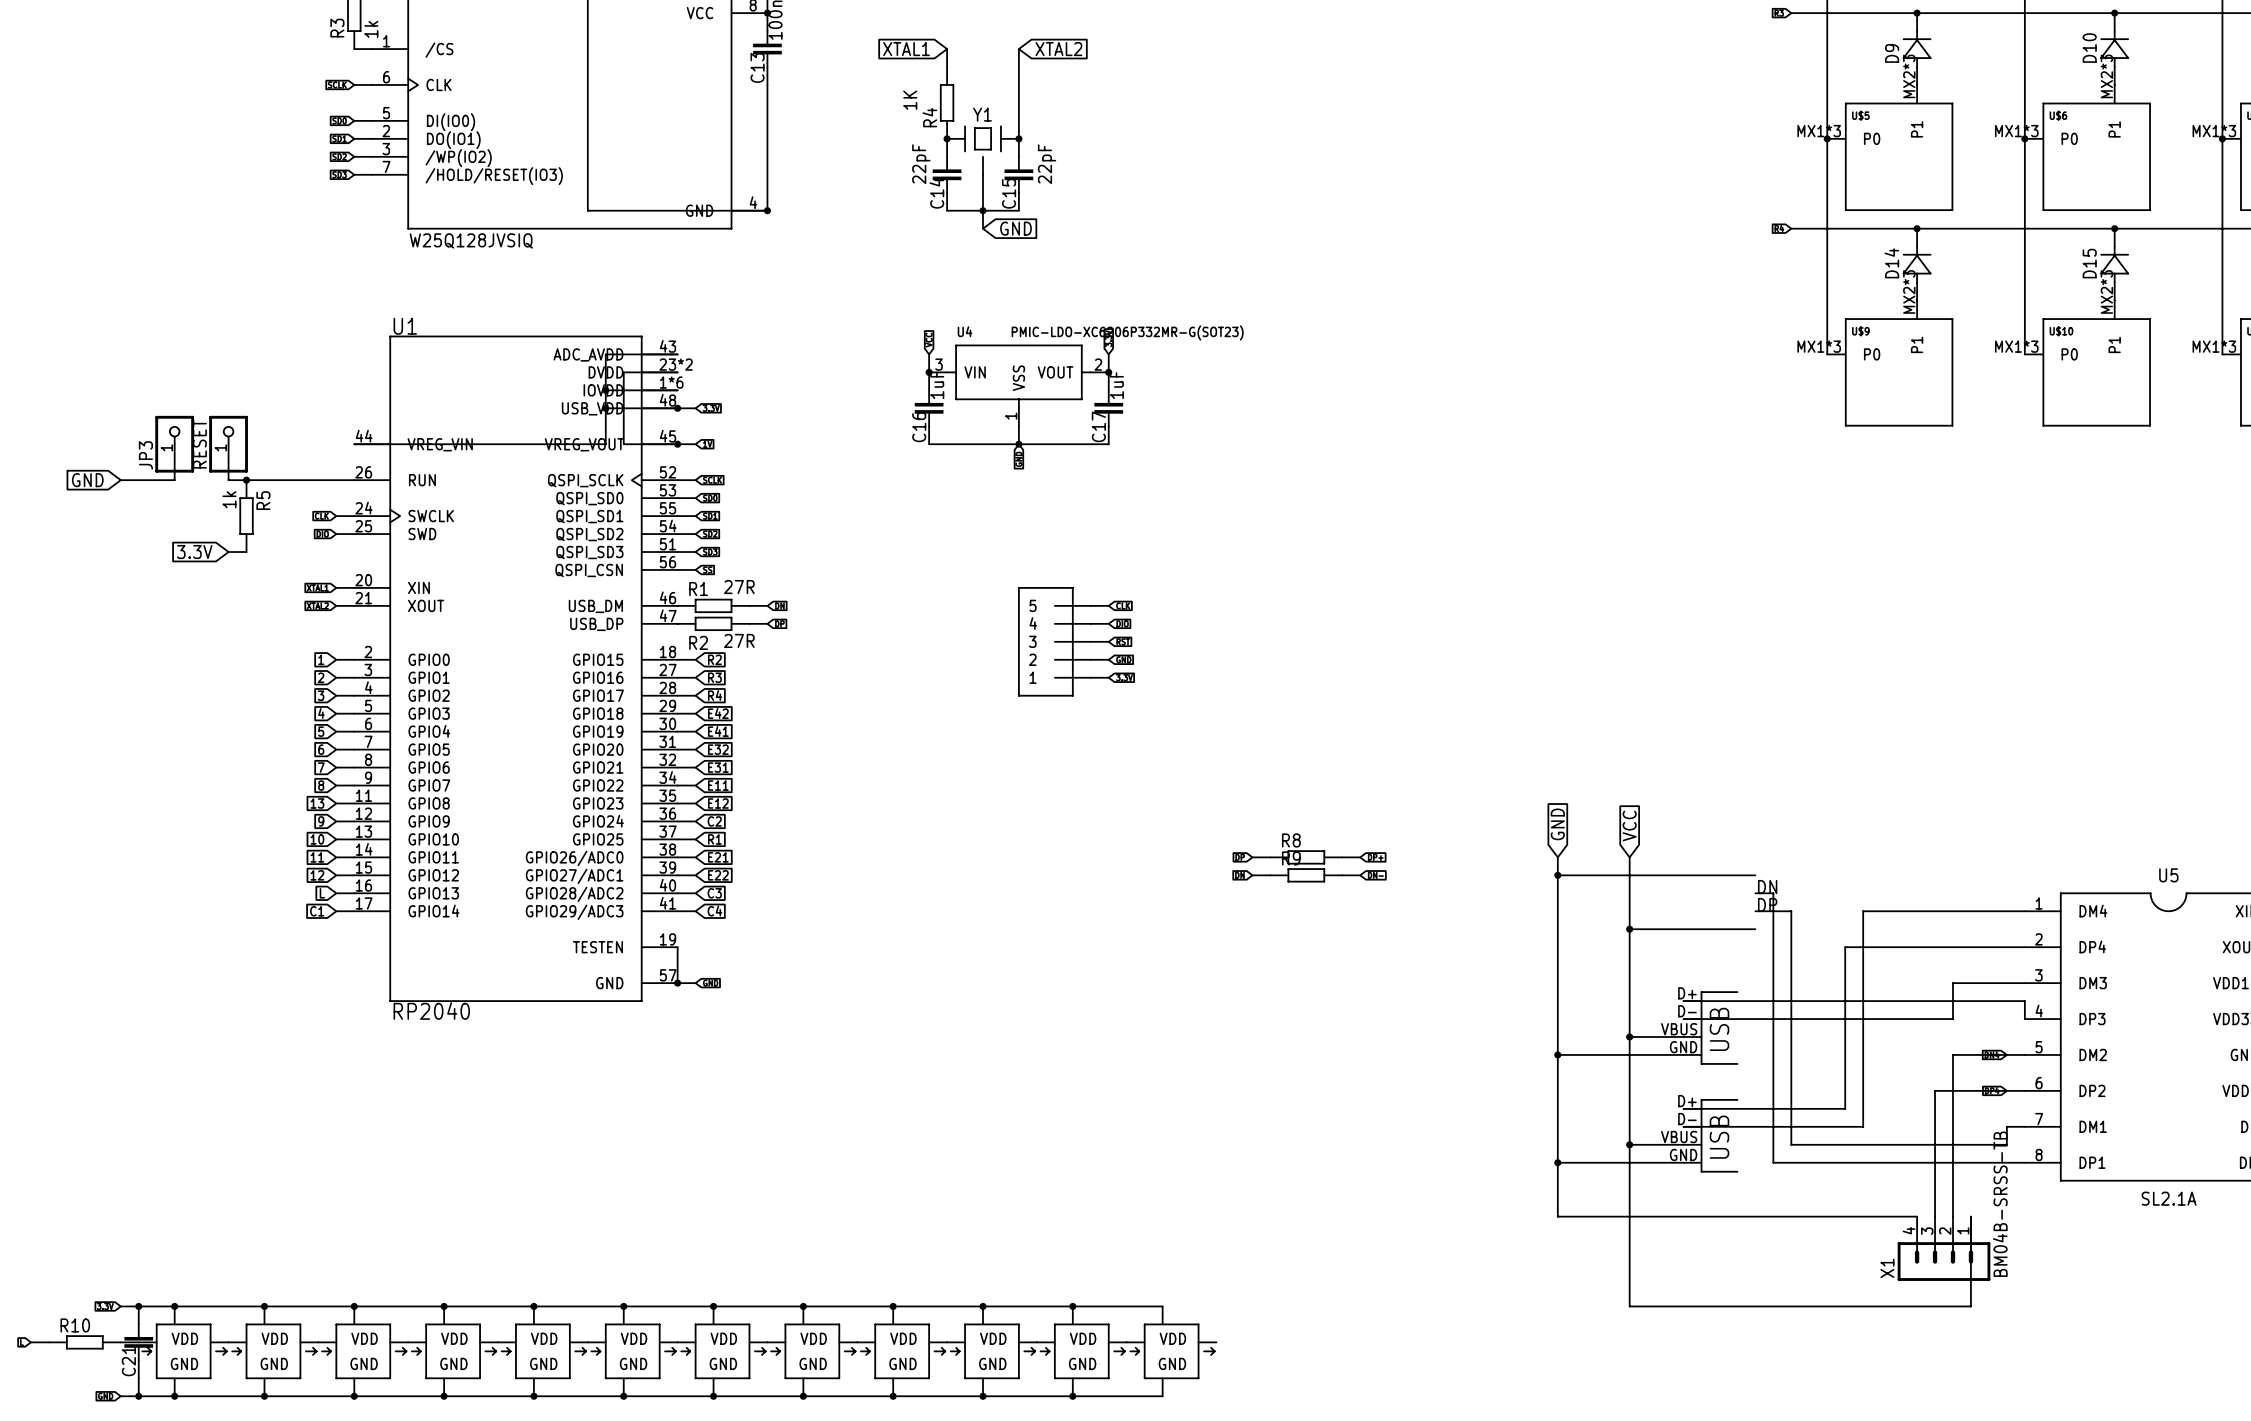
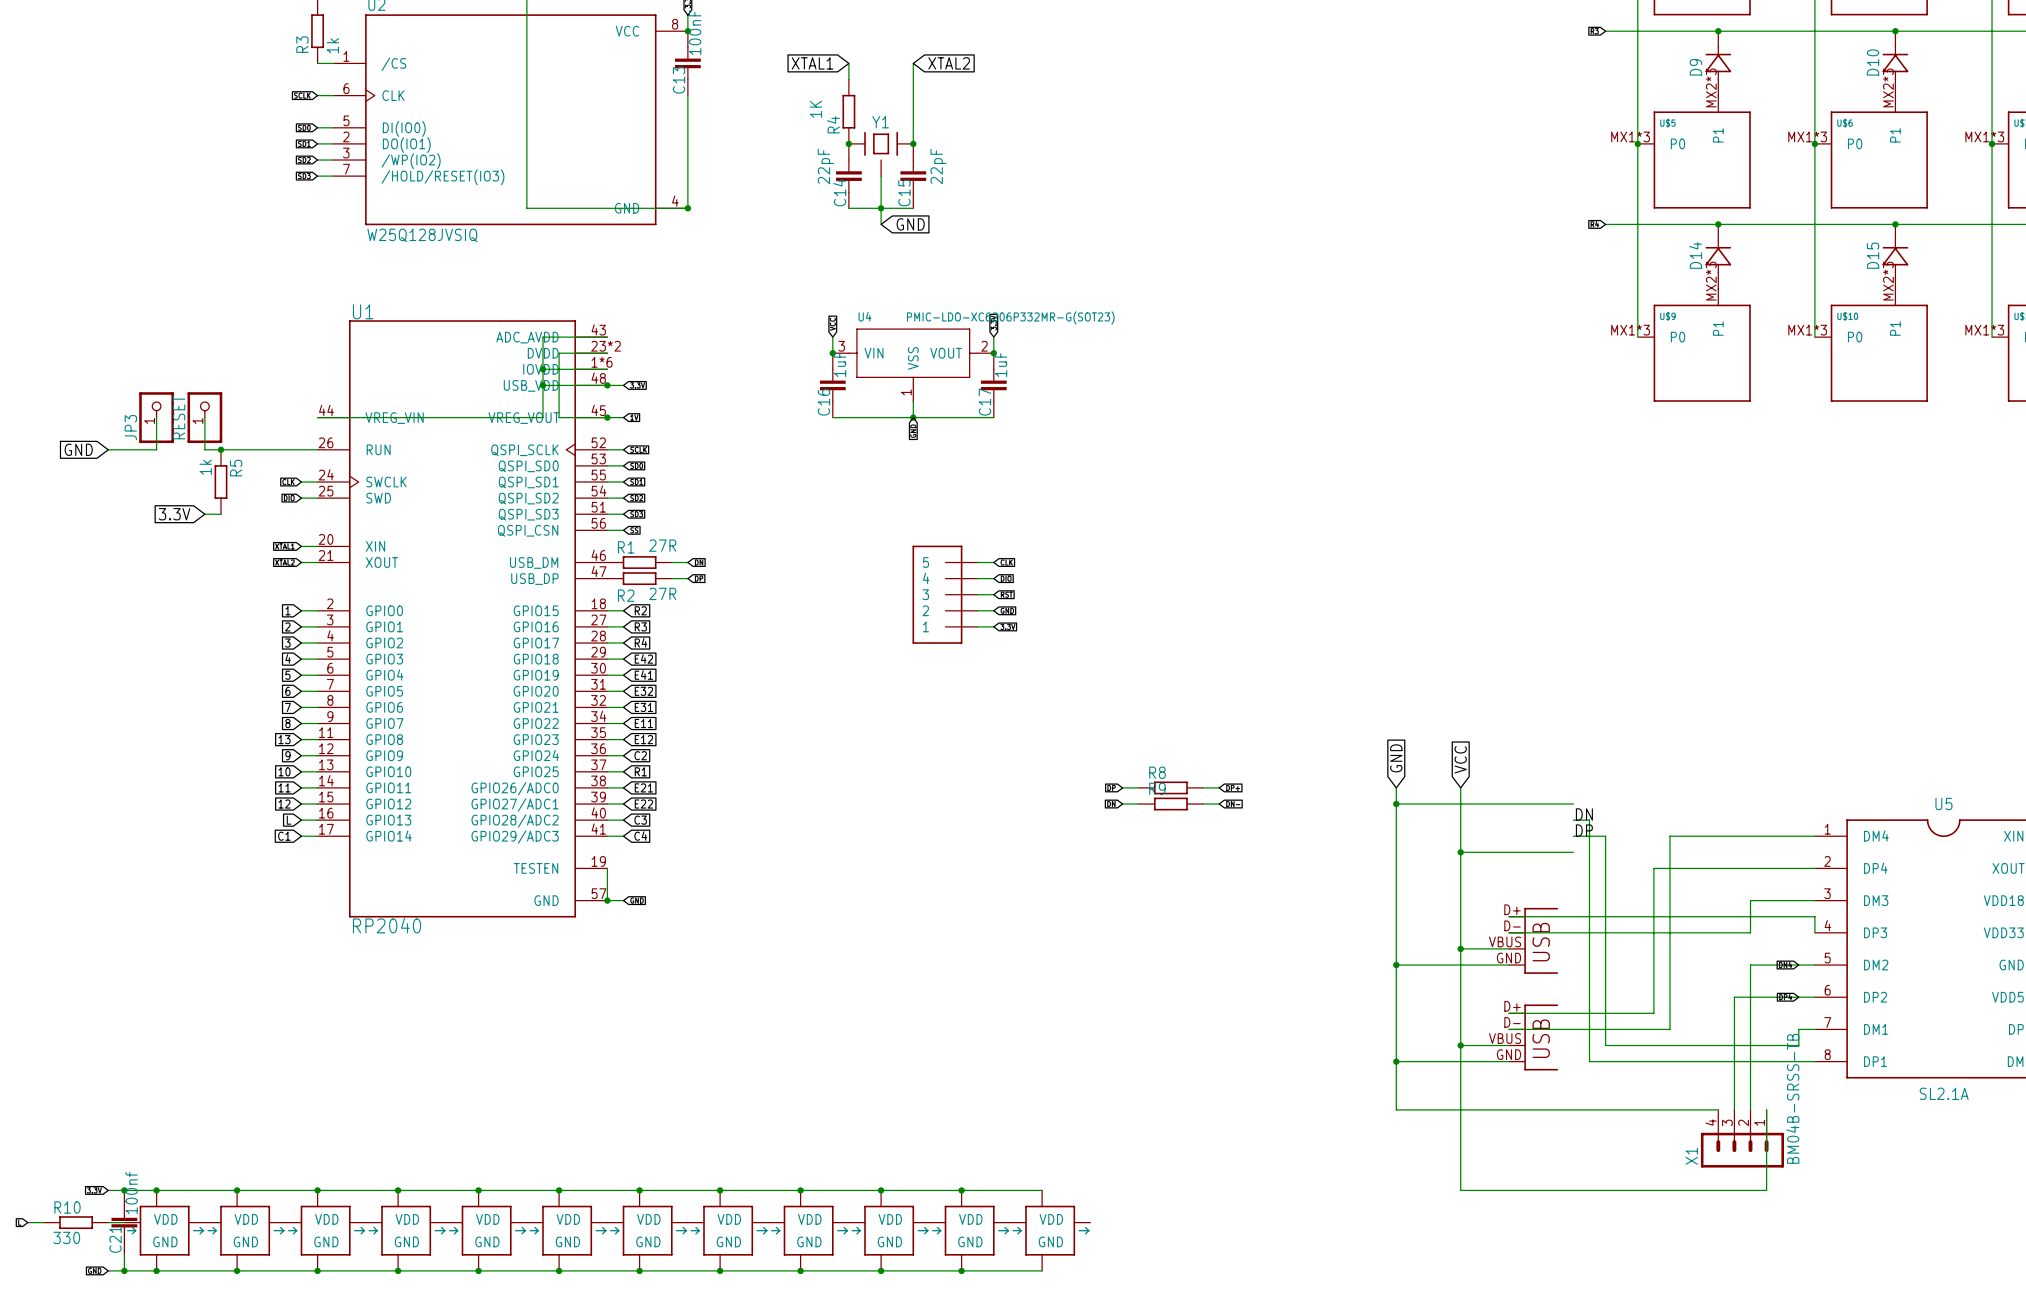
C21 value: none -> 100nf (131, 1193)
R10 value: none -> 330 (66, 1237)

